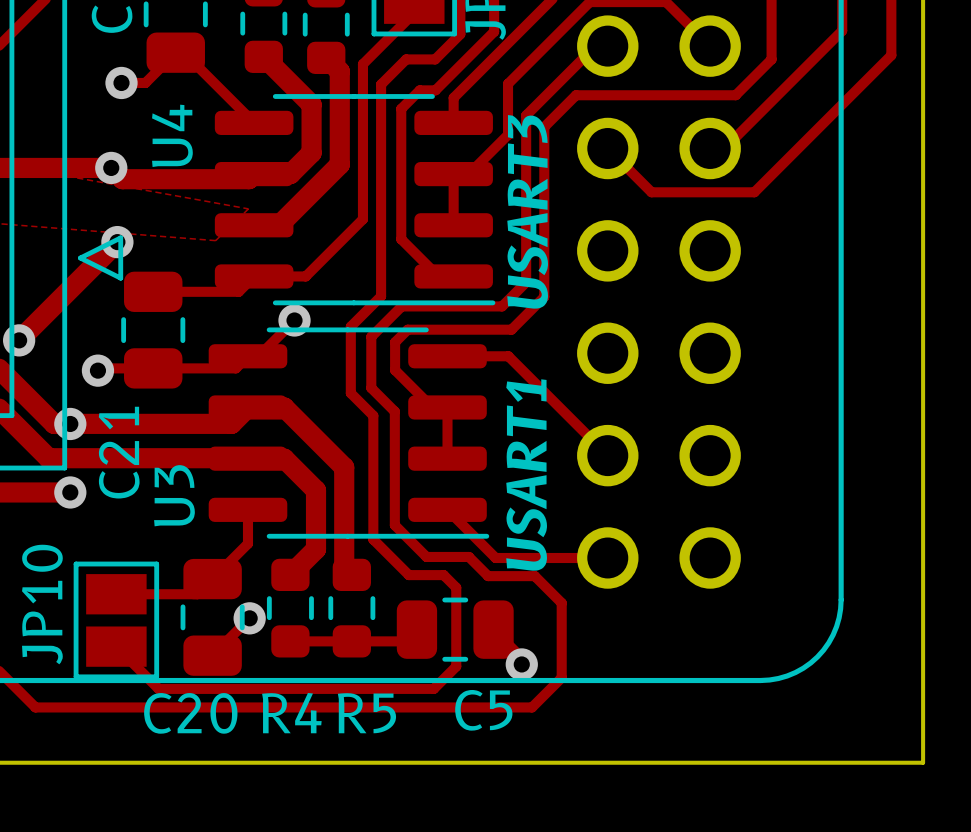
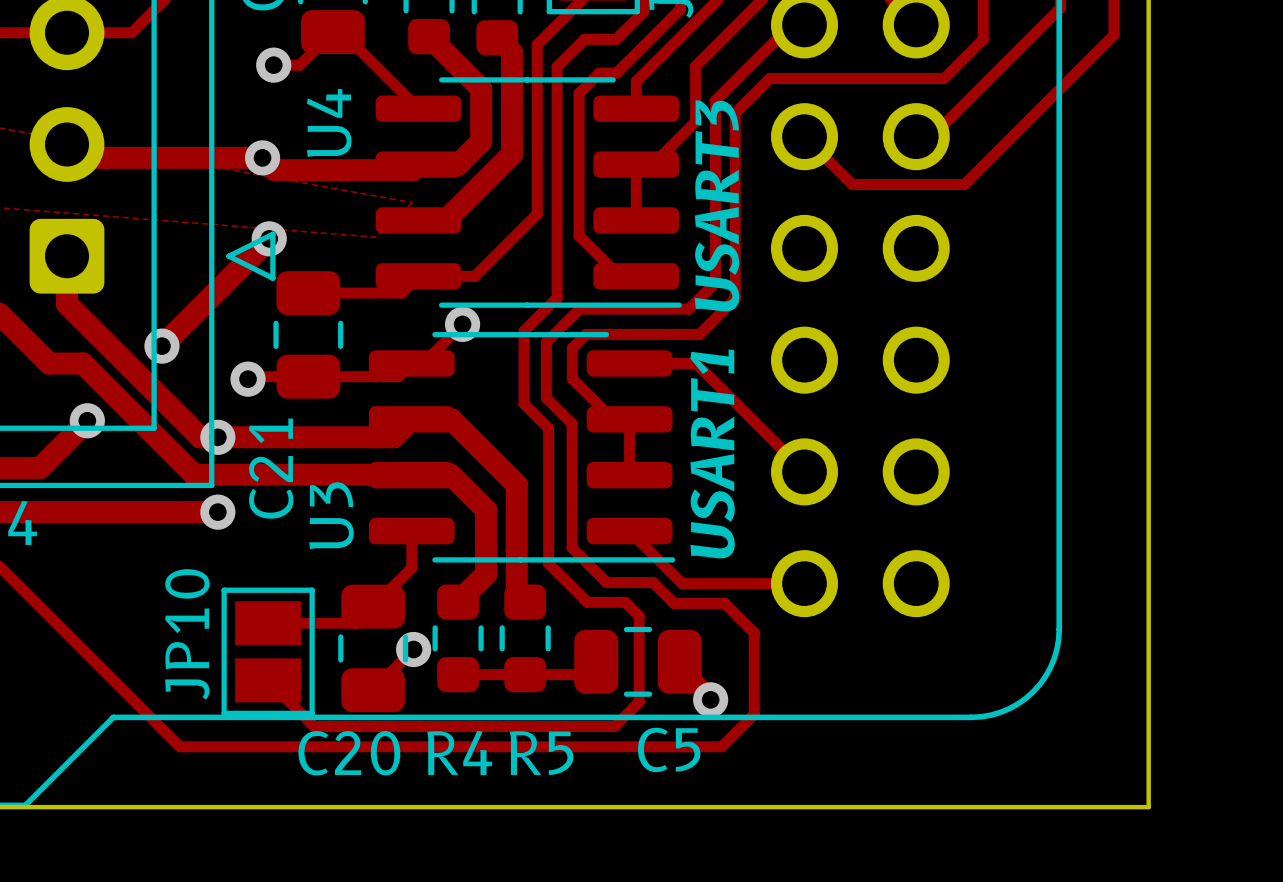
text position: USART1 (526, 475) -> USART1 (712, 454)

